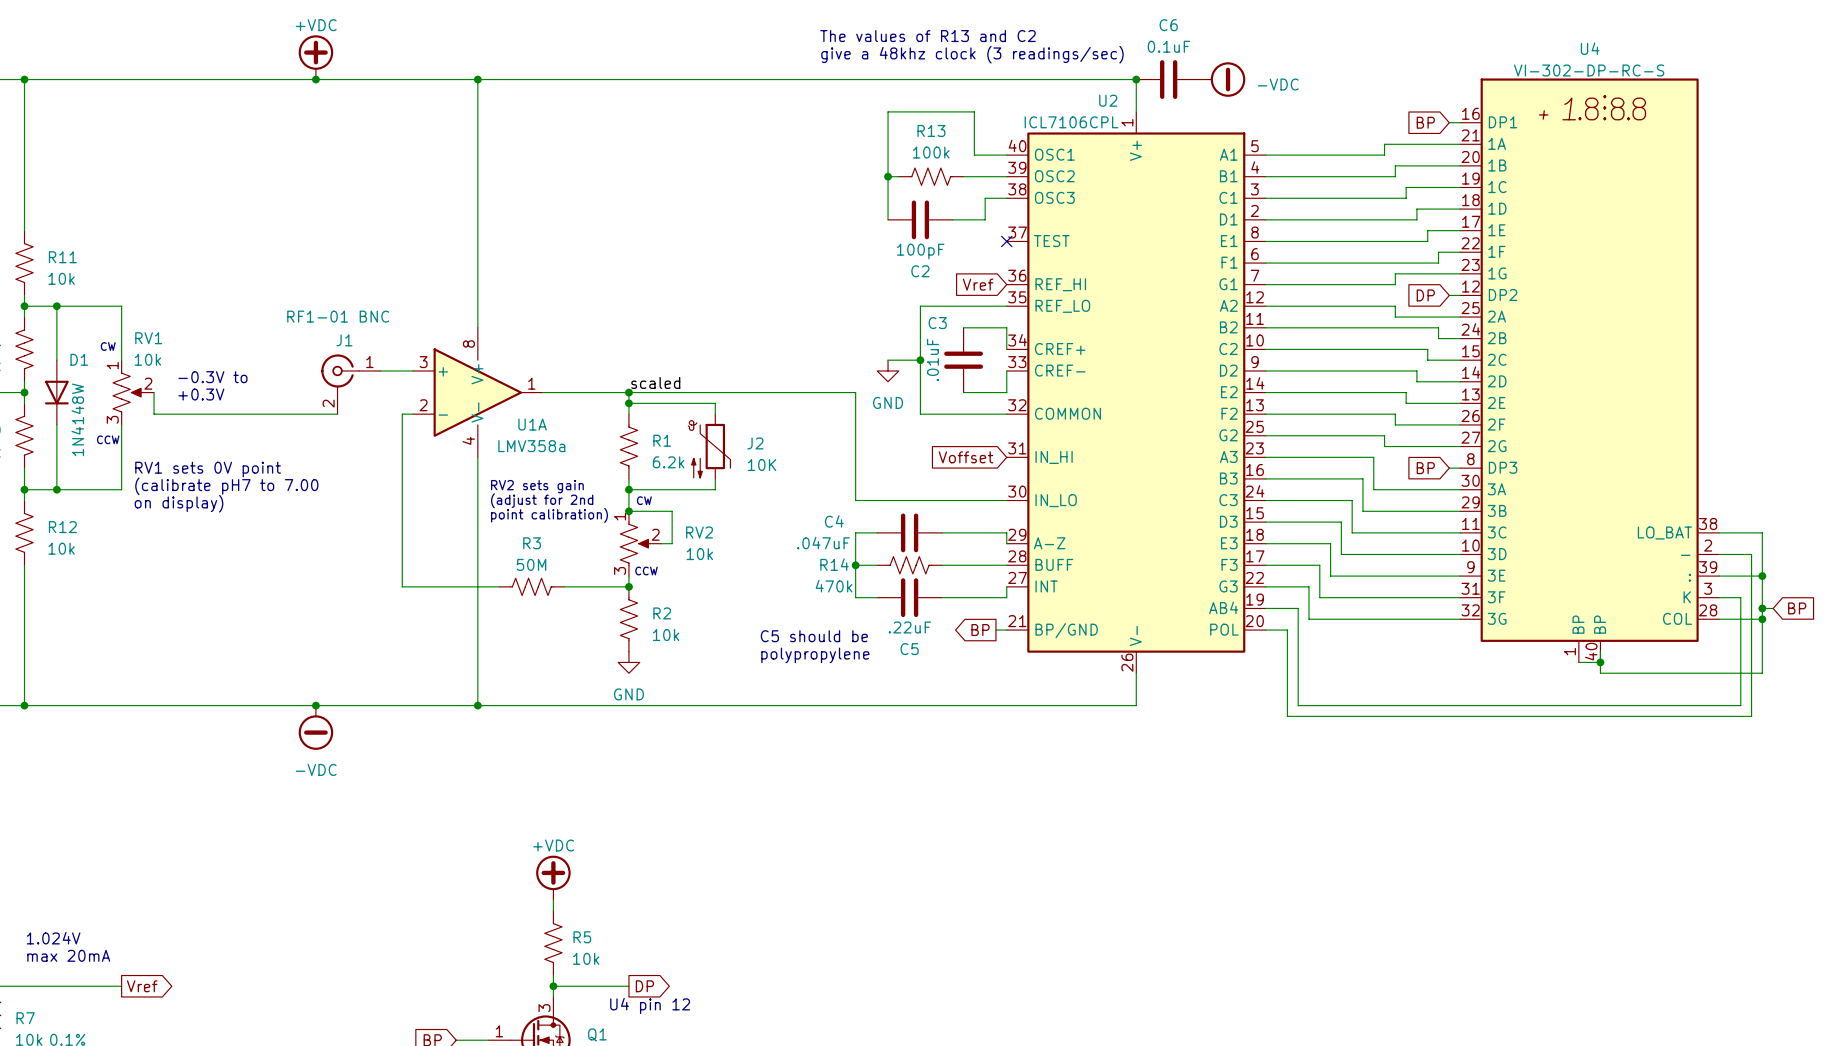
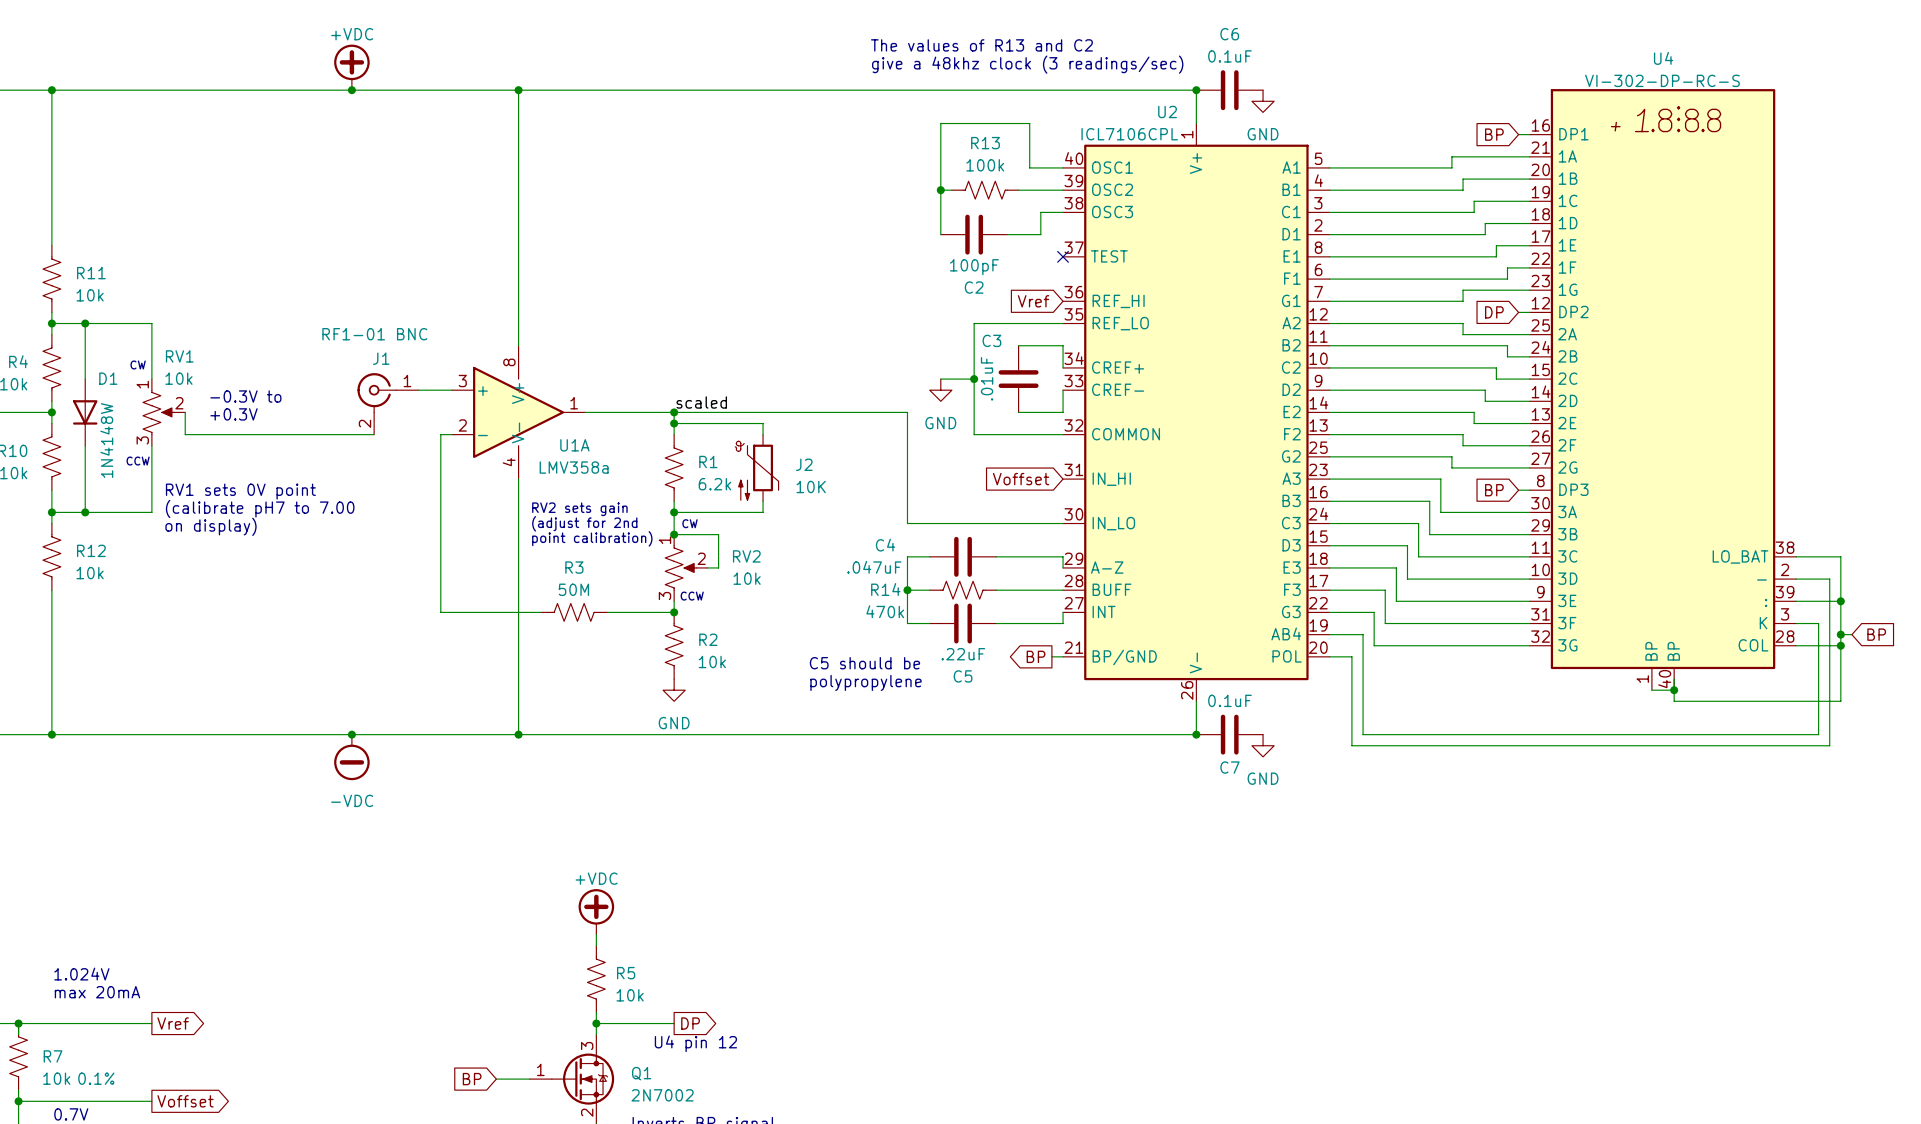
power symbol: -VDC (1223, 79) -> none
power symbol: none -> GND (1263, 101)
junction: none -> (1196, 734)
C7: none -> 0.1uF (1229, 734)
power symbol: none -> GND (1263, 745)

